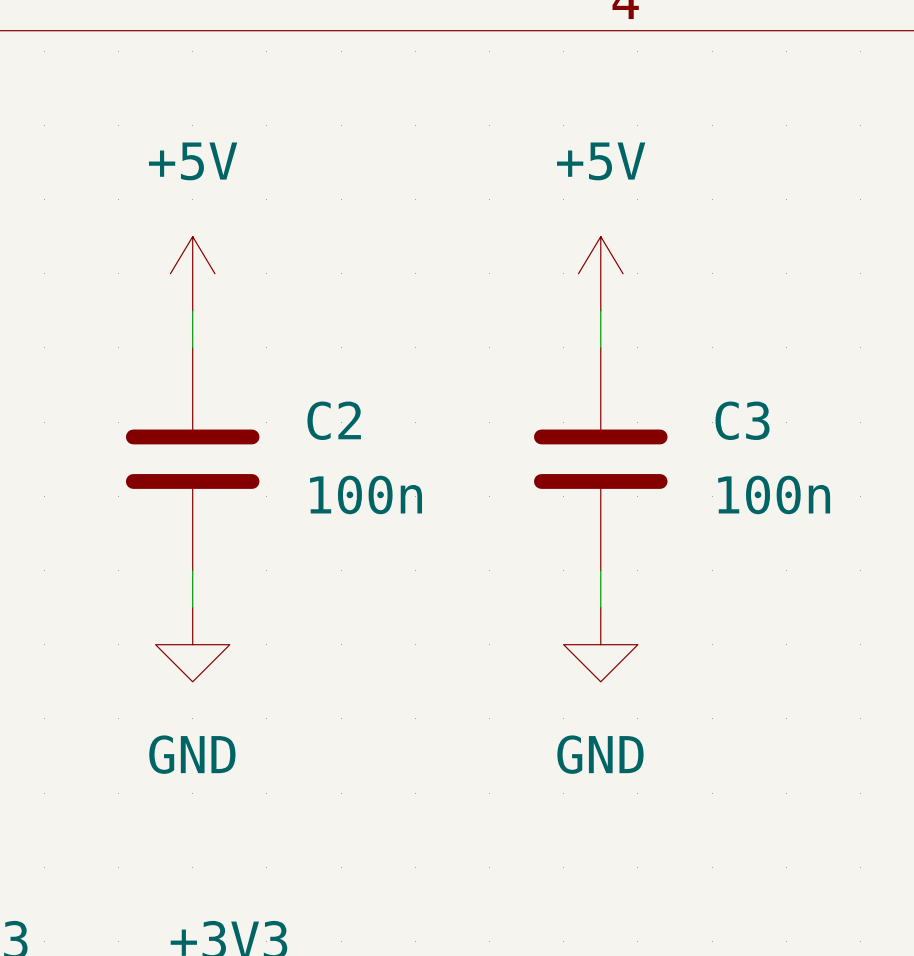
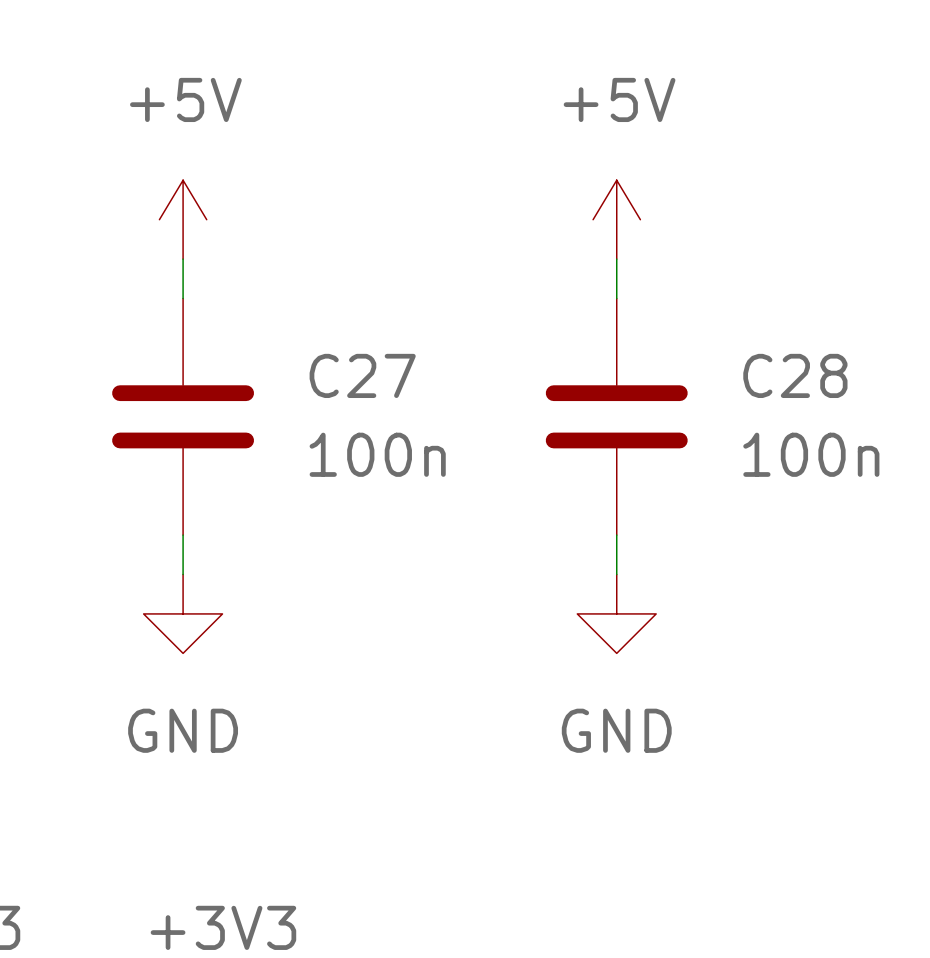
C2 name: C2 (334, 420) -> C27 (362, 375)
C3 name: C3 (742, 420) -> C28 (795, 375)

